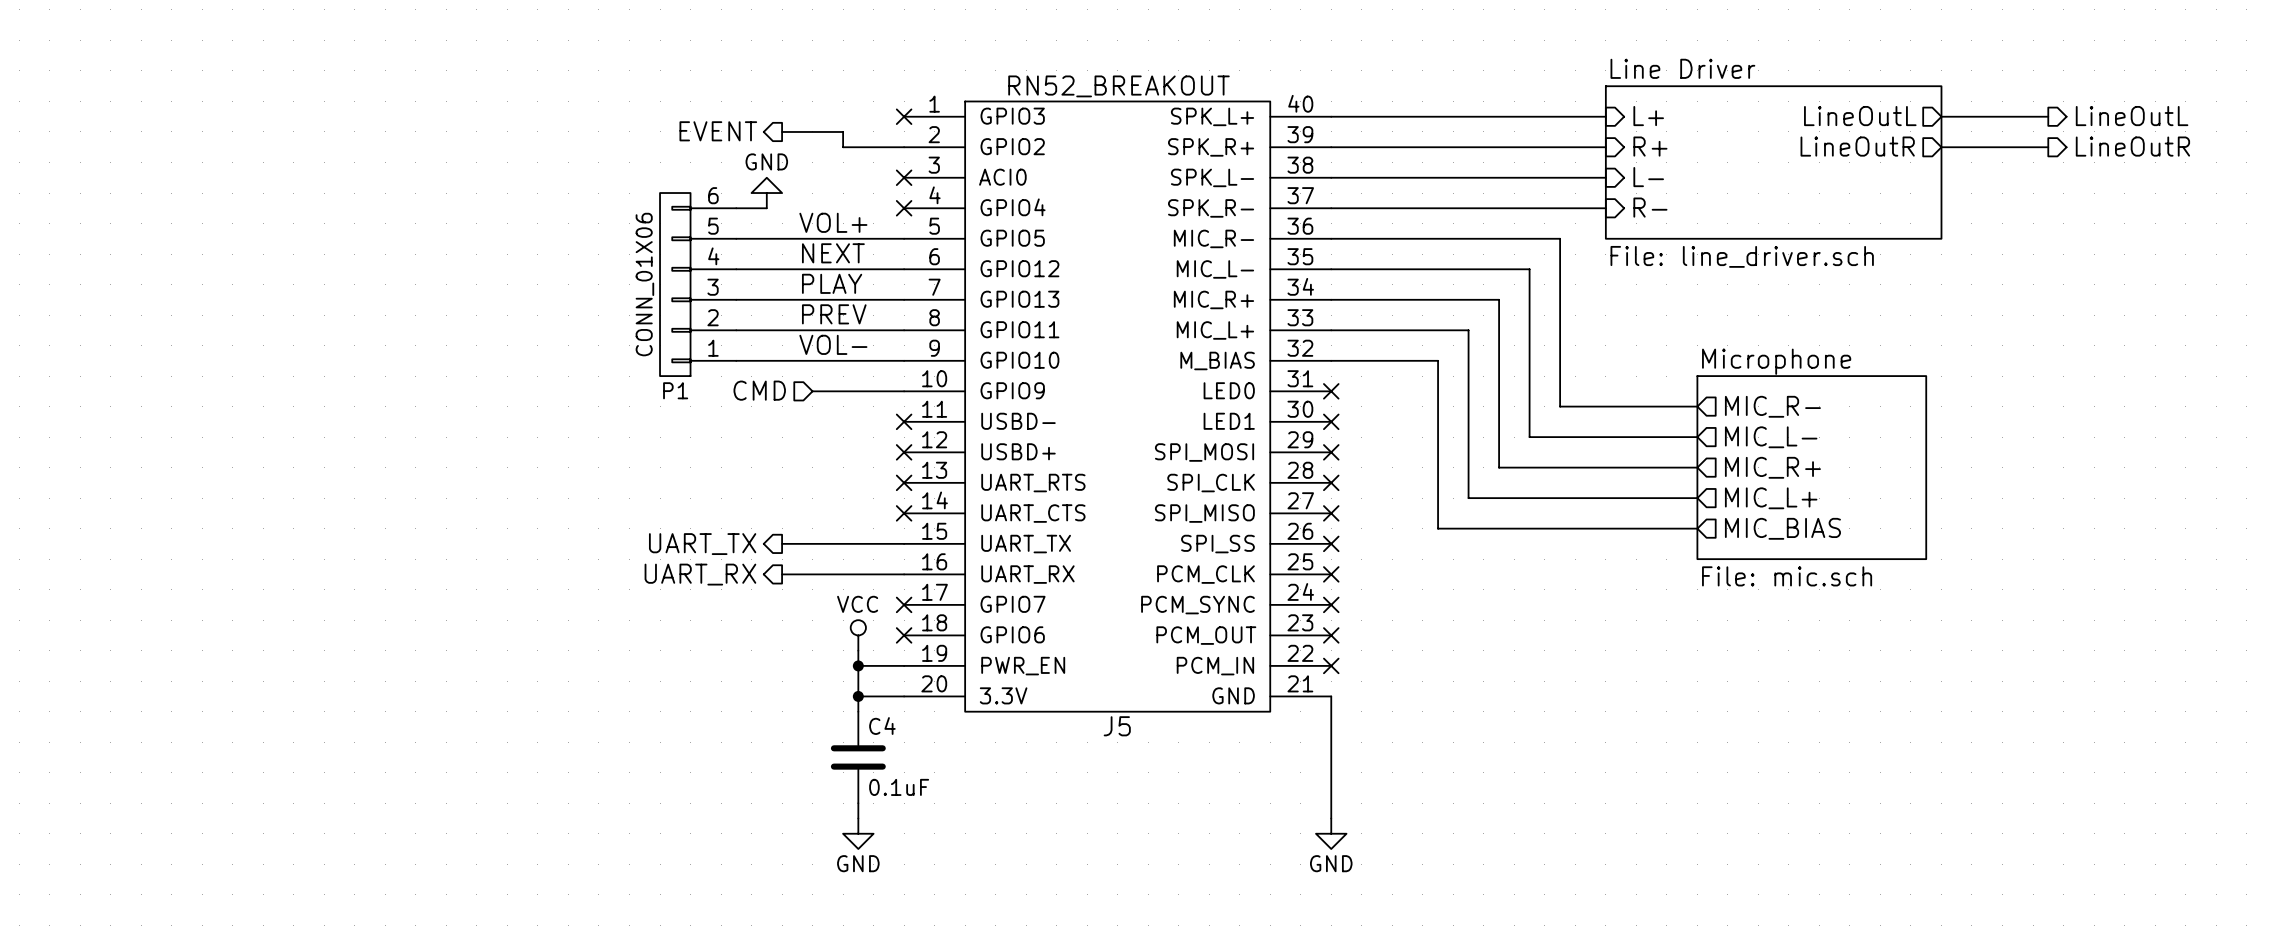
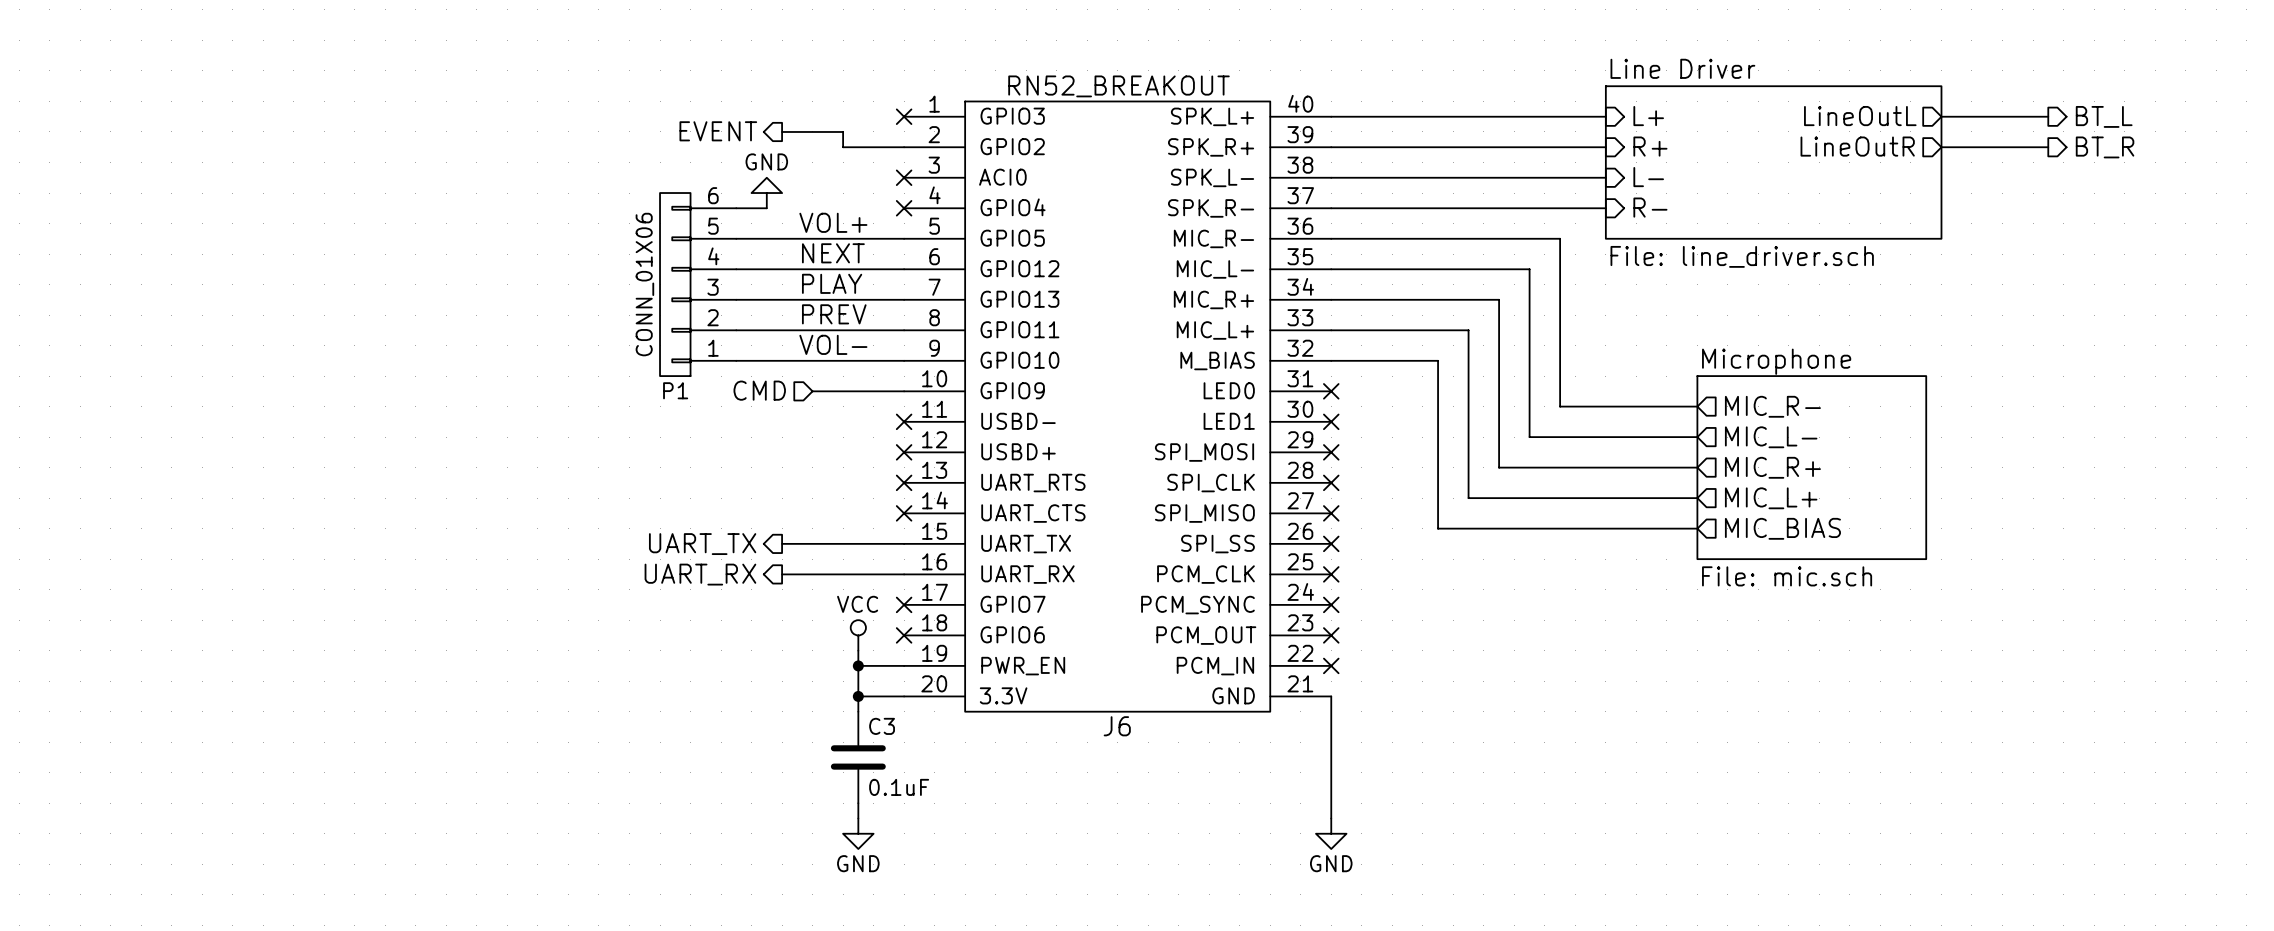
hierarchical label: LineOutL (2132, 116) -> BT_L (2104, 116)
hierarchical label: LineOutR (2132, 146) -> BT_R (2105, 147)
C4 name: C4 (882, 726) -> C3 (882, 726)
J5 name: J5 (1117, 726) -> J6 (1117, 726)

